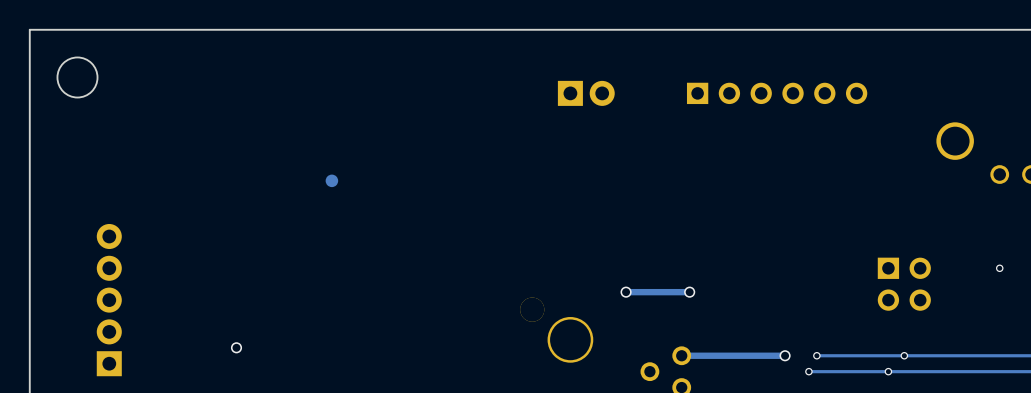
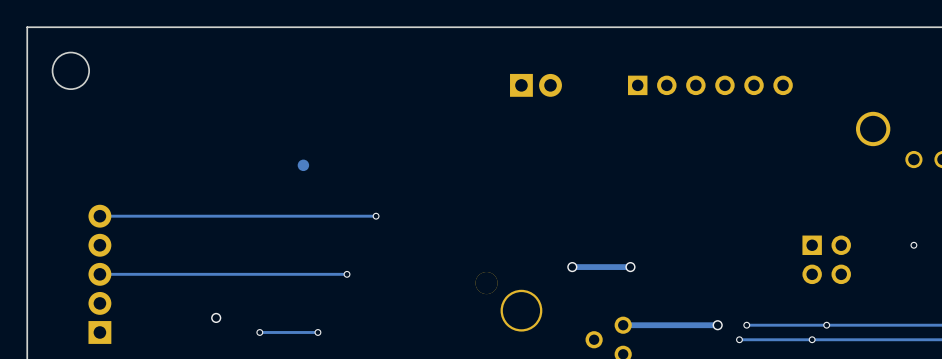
track: none -> (376, 216) (99, 216)
via: none -> (376, 216)
track: none -> (347, 274) (99, 274)
via: none -> (347, 274)
via: none -> (259, 332)
track: none -> (317, 332) (259, 332)
via: none -> (317, 332)

